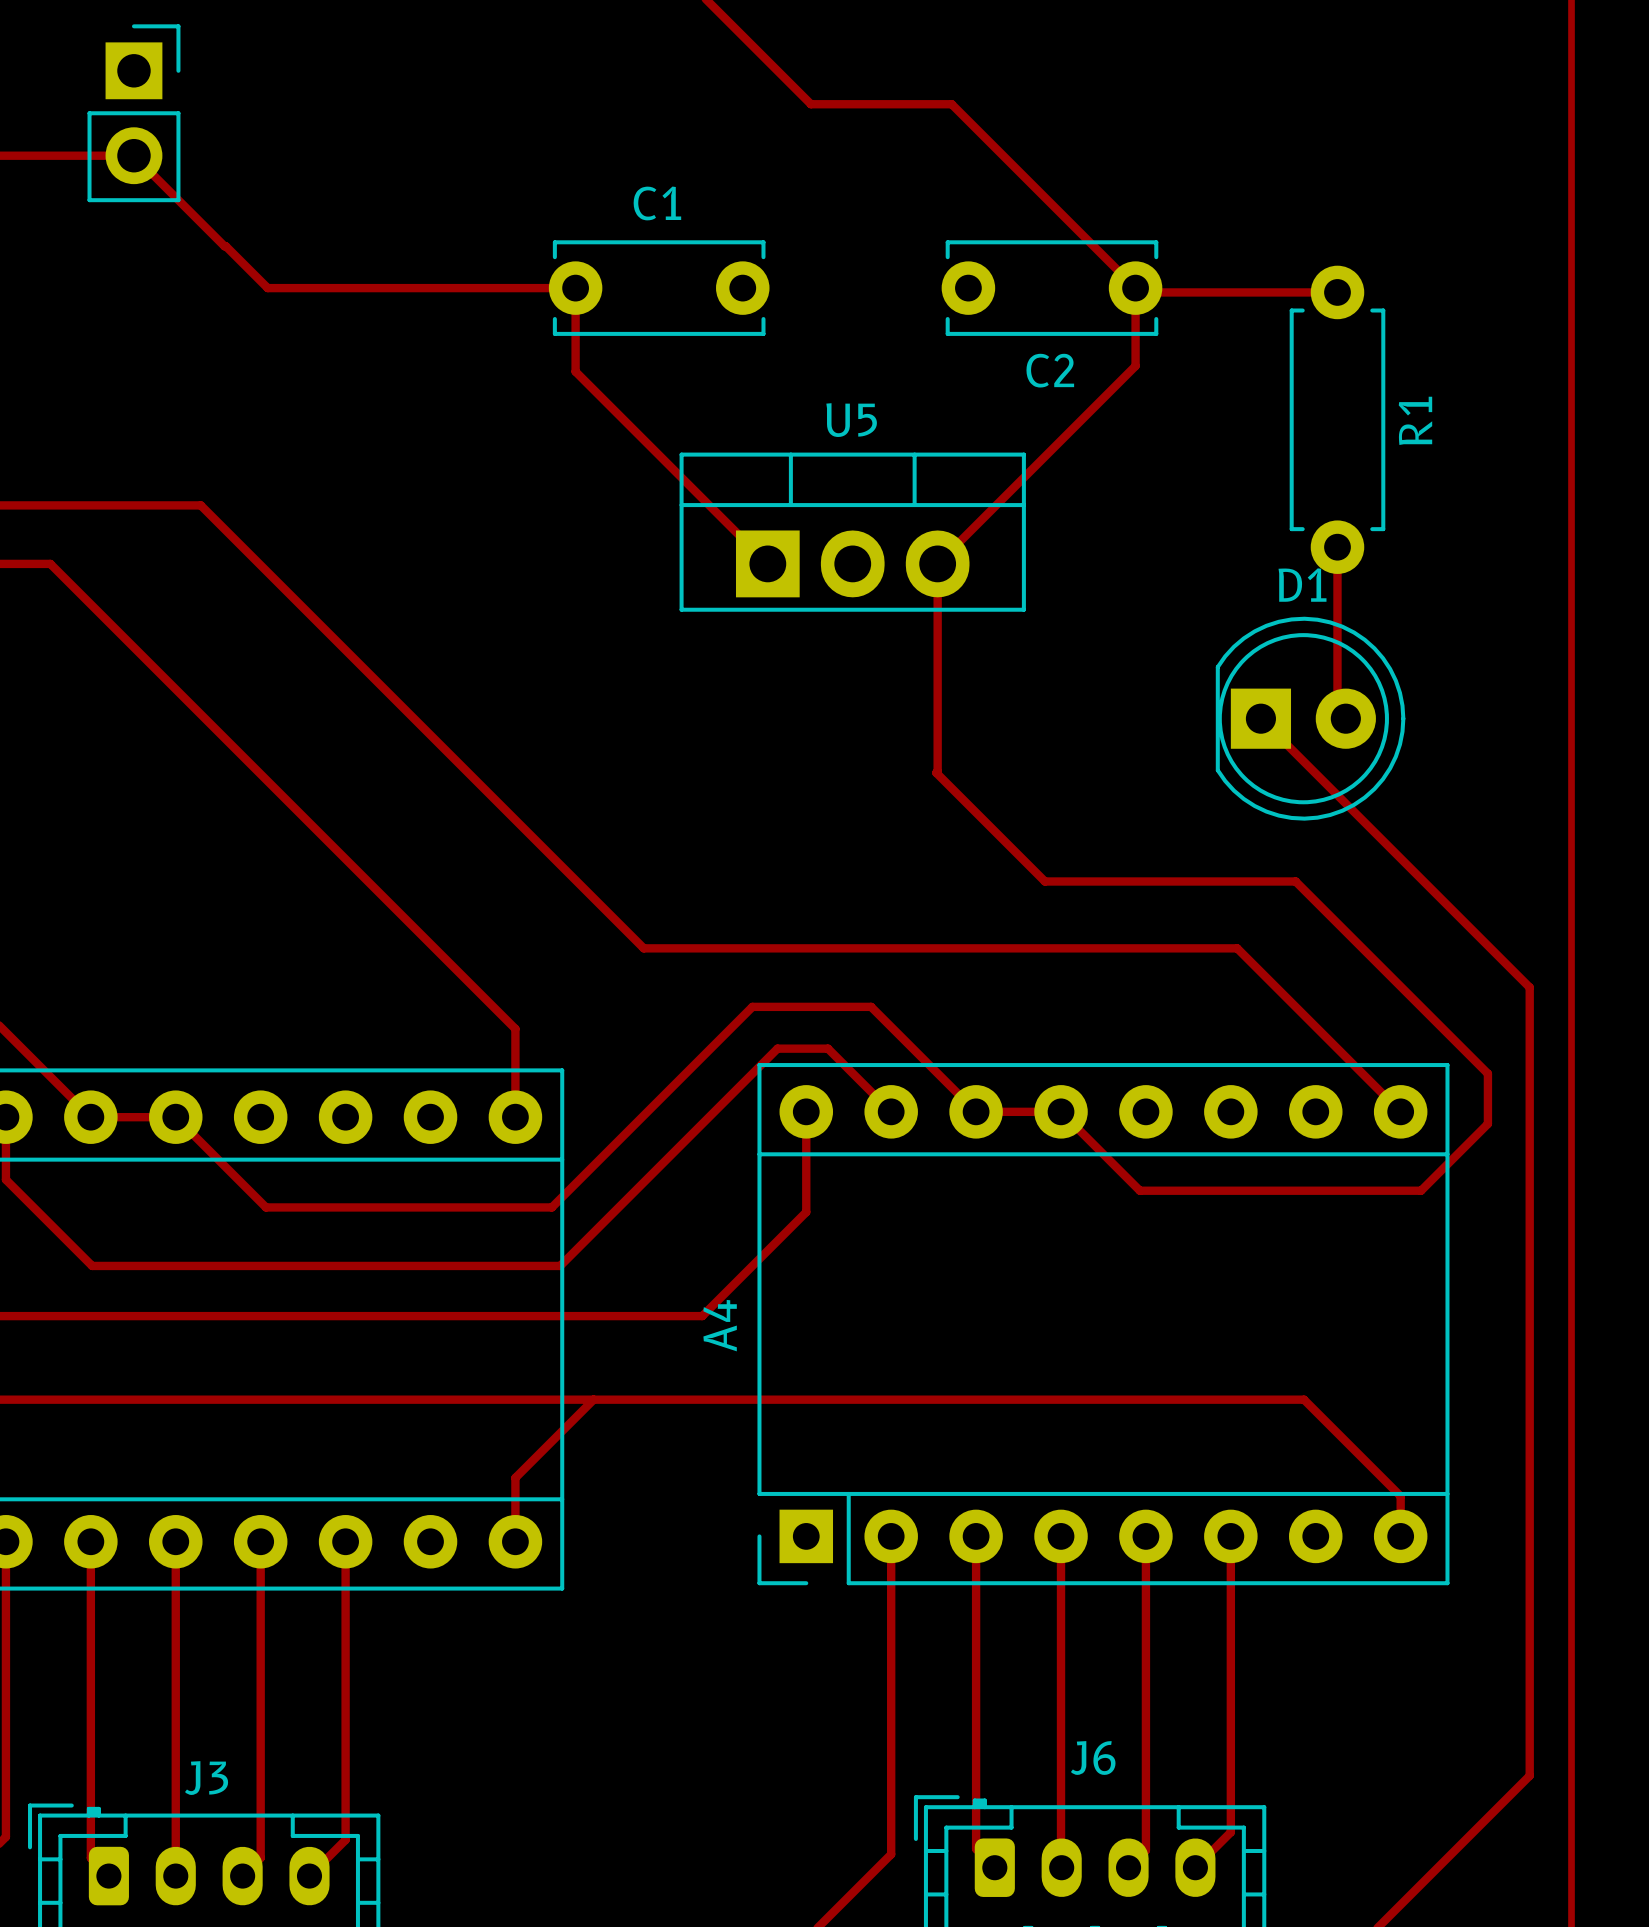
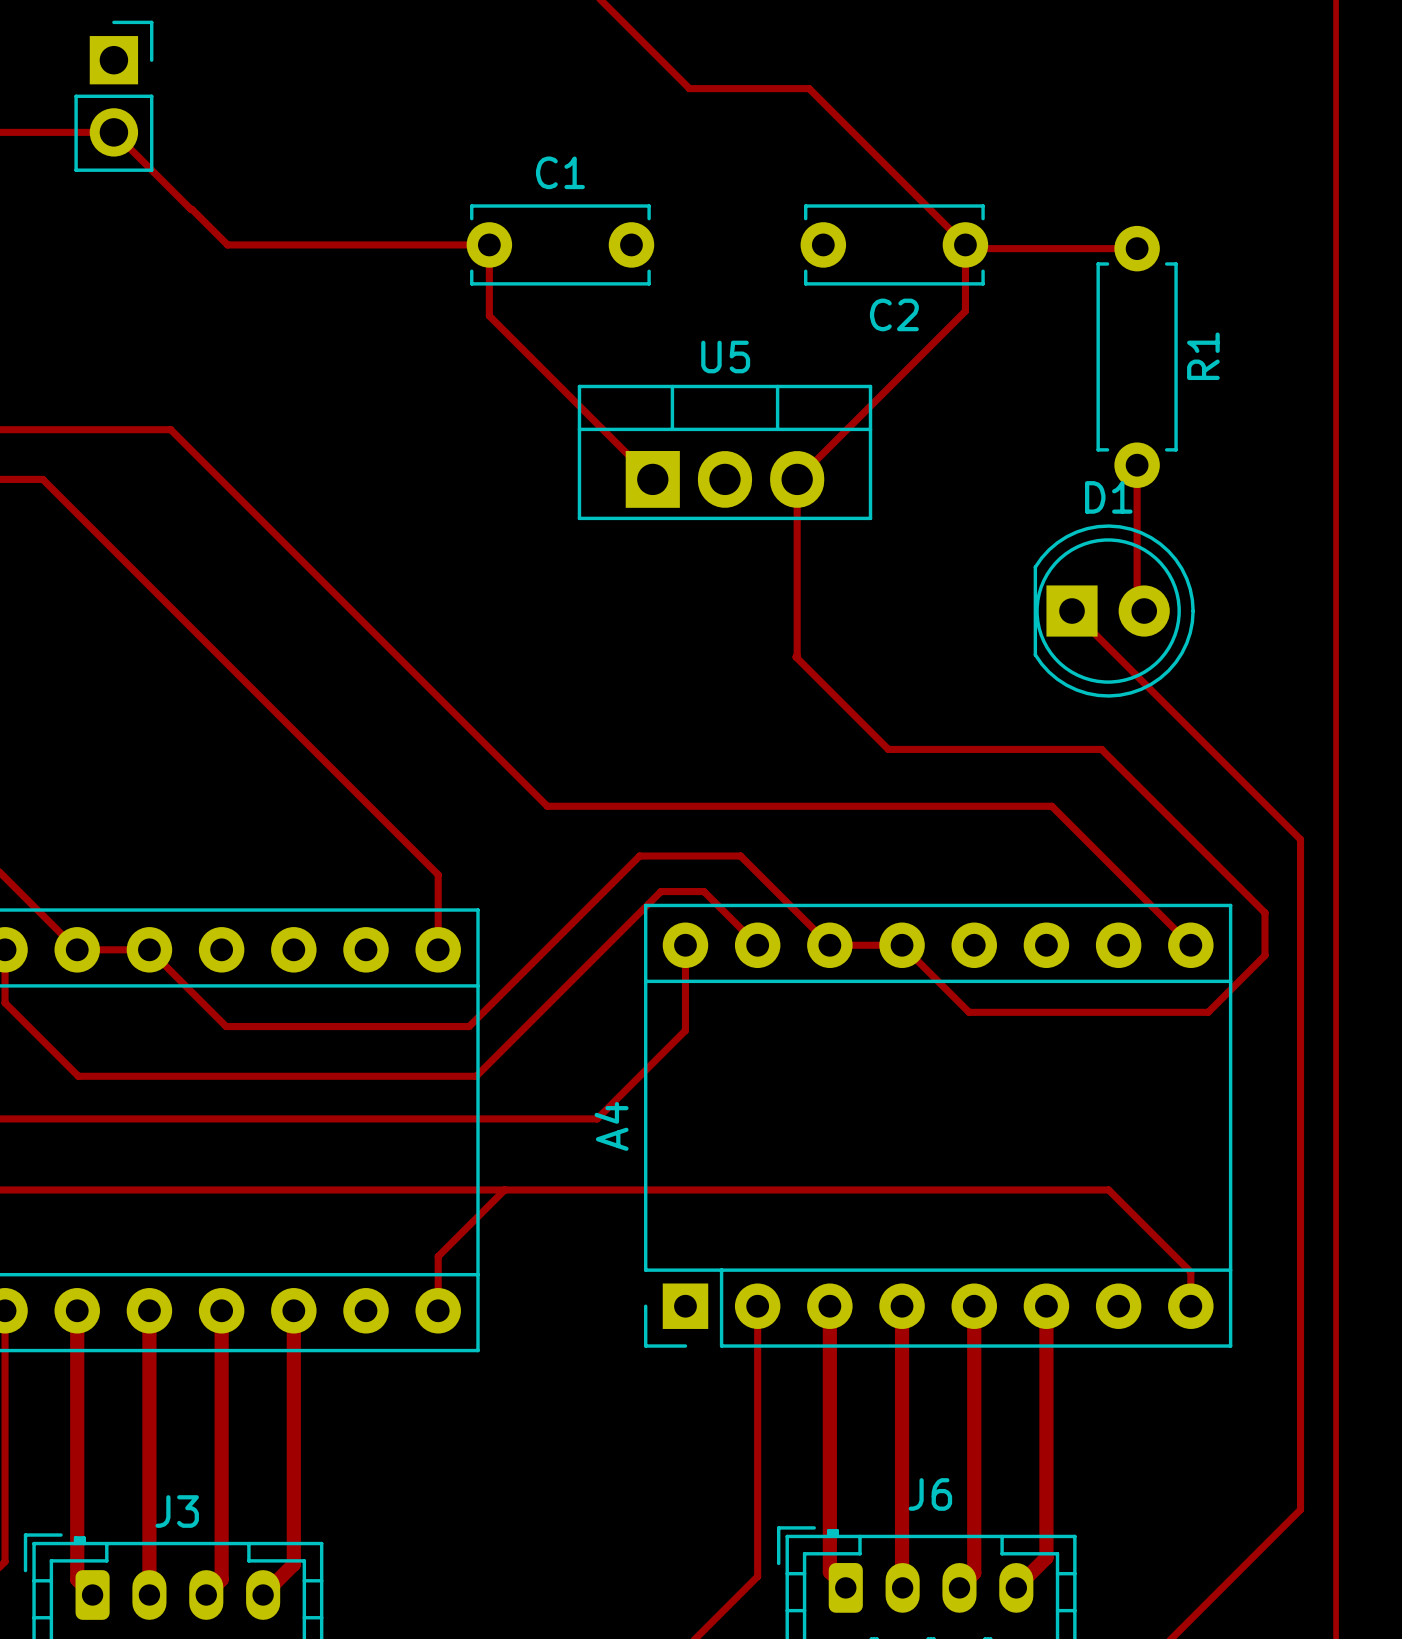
top track width: thin (976, 1536) (976, 1848) (994, 1867) -> thick (829, 1306) (829, 1571) (845, 1587)
top track width: thin (1061, 1536) (1061, 1867) -> thick (902, 1306) (902, 1587)
top track width: thin (1145, 1536) (1145, 1850) (1128, 1867) -> thick (974, 1306) (974, 1573) (959, 1587)
top track width: thin (1230, 1536) (1230, 1832) (1195, 1867) -> thick (1046, 1306) (1046, 1557) (1016, 1587)
top track width: thin (90, 1541) (90, 1858) (108, 1876) -> thick (77, 1310) (77, 1579) (92, 1595)
top track width: thin (175, 1541) (175, 1876) -> thick (149, 1310) (149, 1595)
top track width: thin (260, 1541) (260, 1858) (242, 1876) -> thick (221, 1310) (221, 1579) (206, 1595)
top track width: thin (345, 1541) (345, 1839) (309, 1876) -> thick (293, 1310) (293, 1564) (263, 1595)

